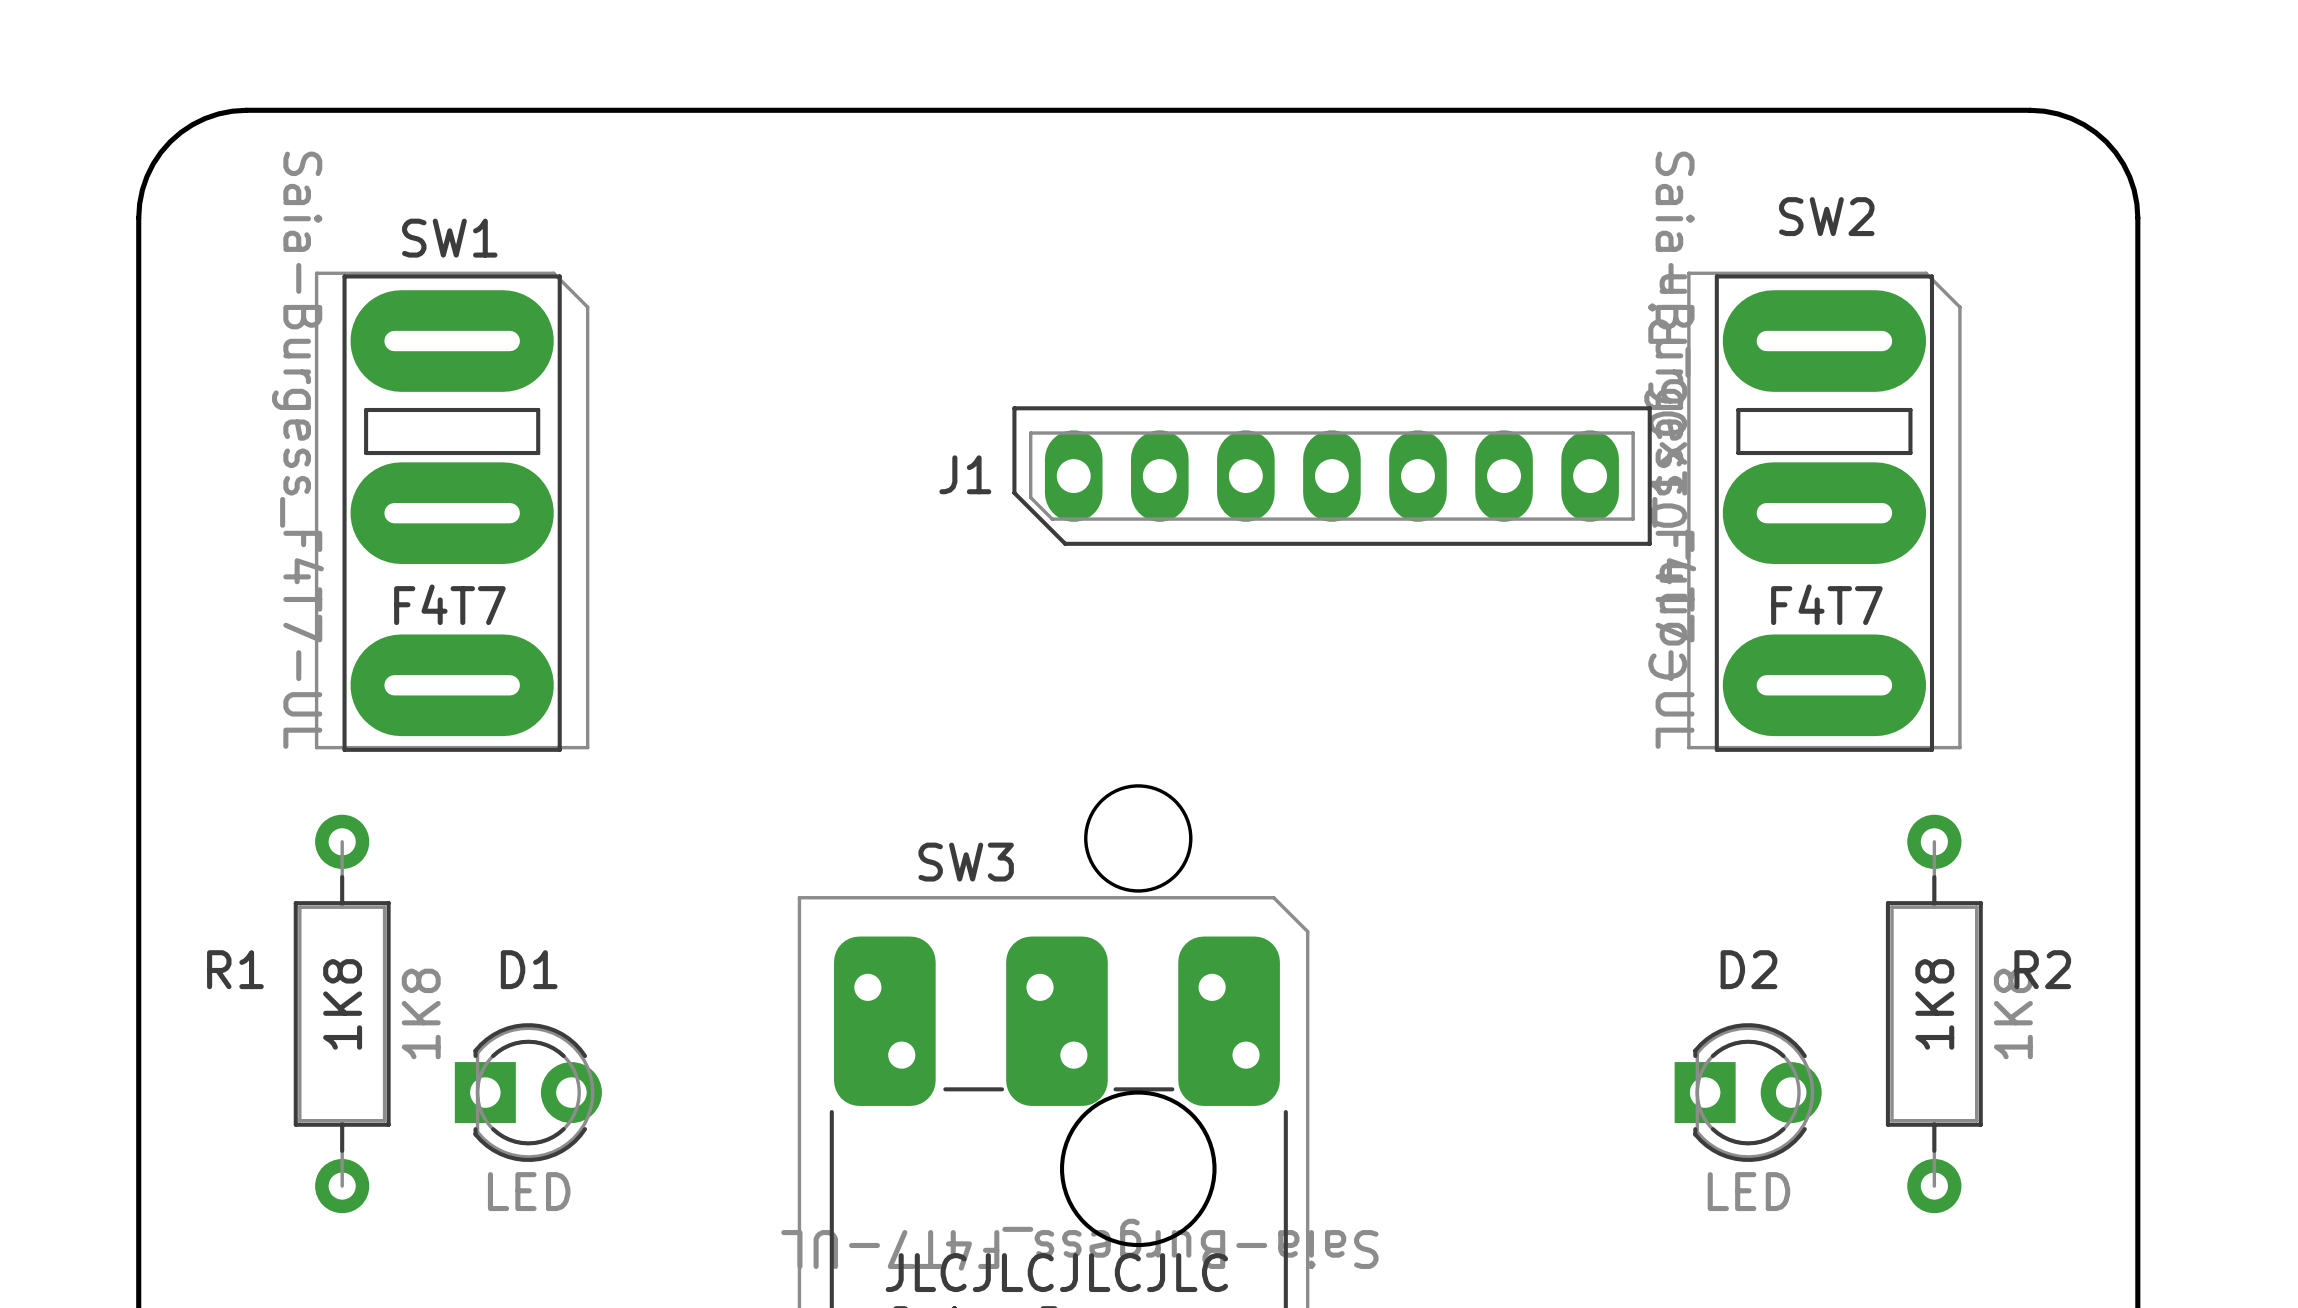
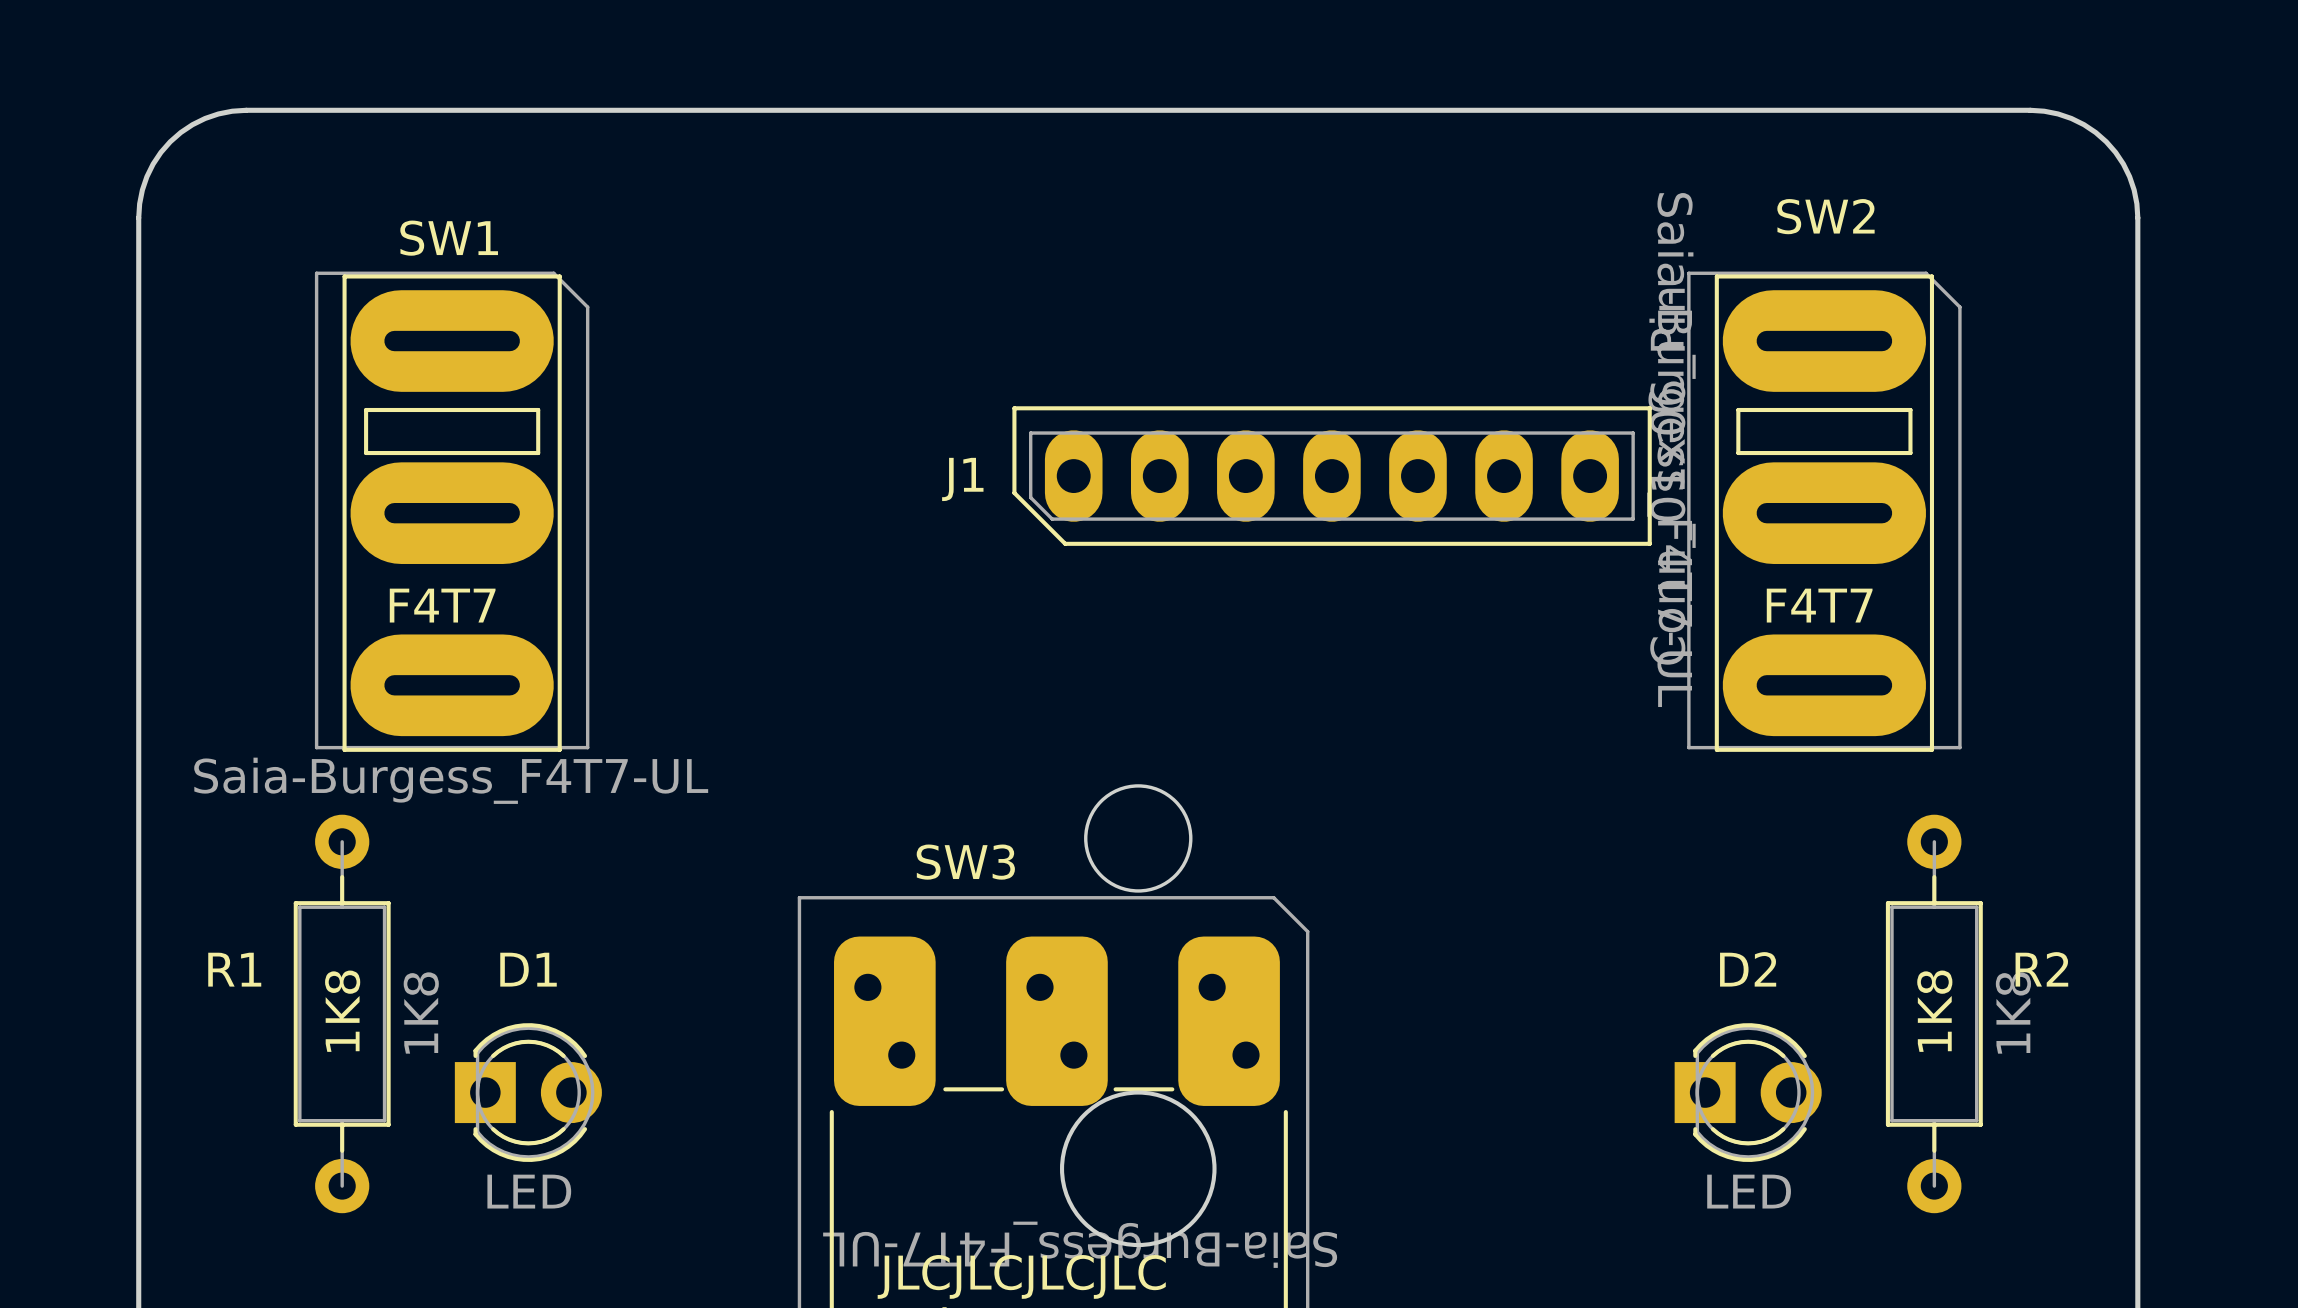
SW1 value rotation: 0° (297, 450) -> 90° counterclockwise (451, 780)

